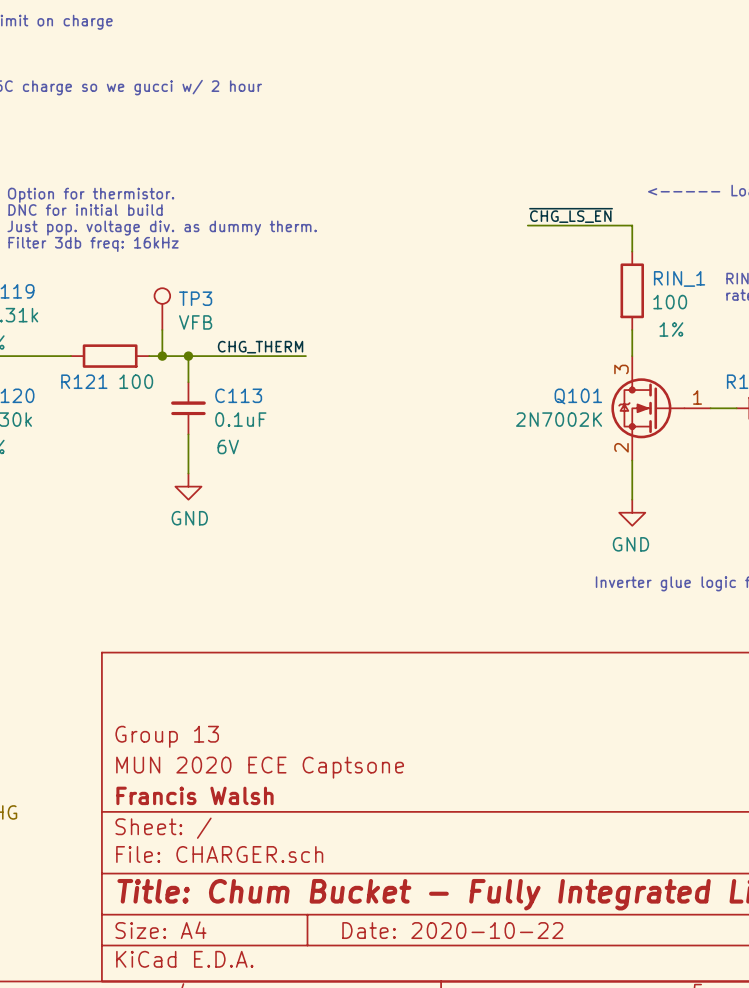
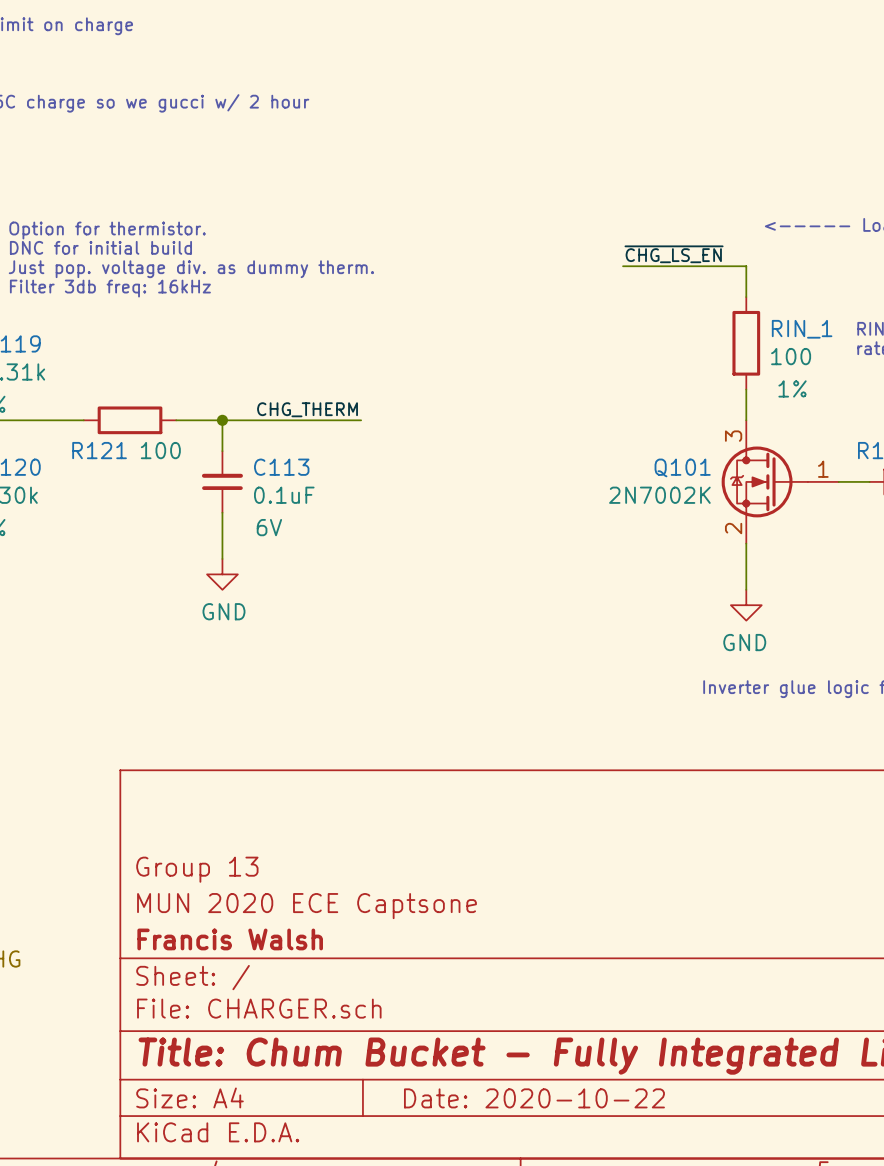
TP3: VFB (162, 309) -> none
wire: (162, 329) (162, 356) -> none
junction: (162, 356) -> none

